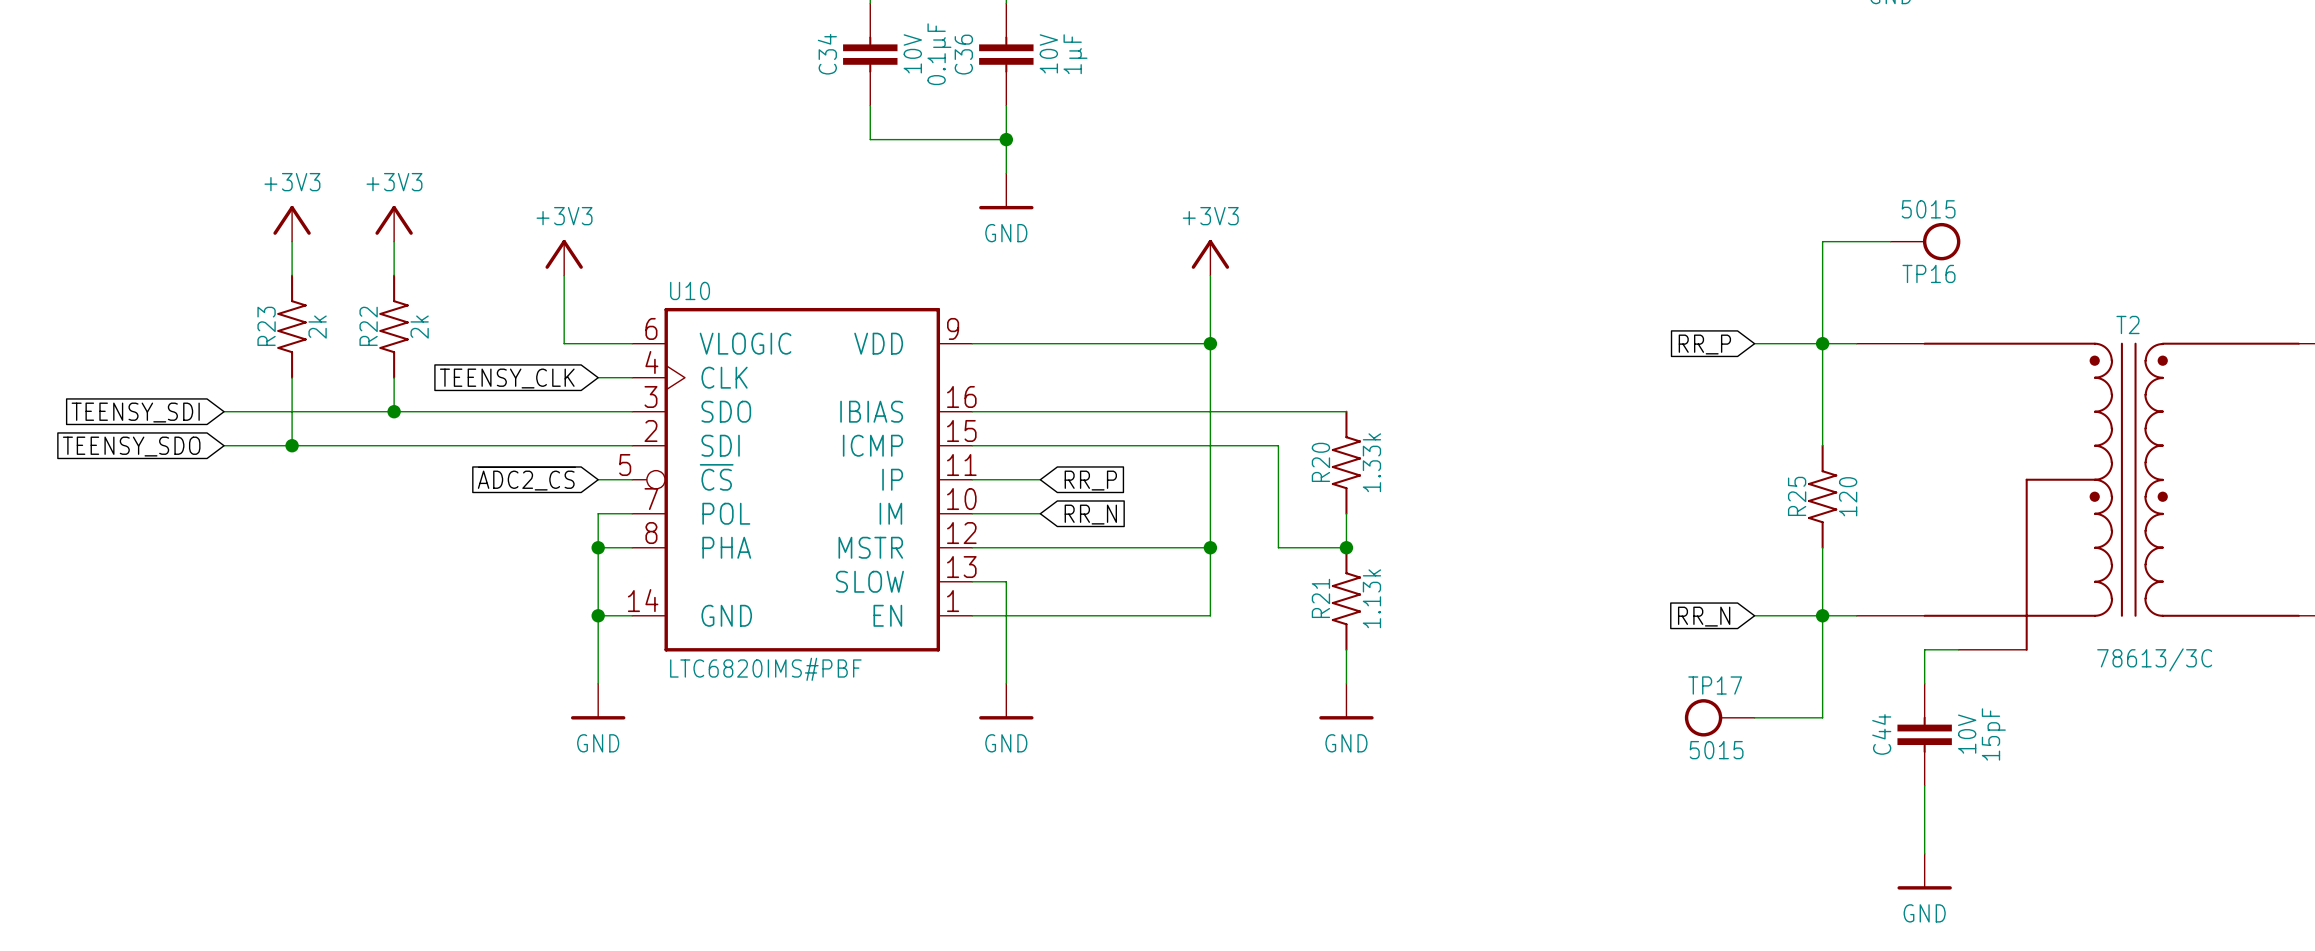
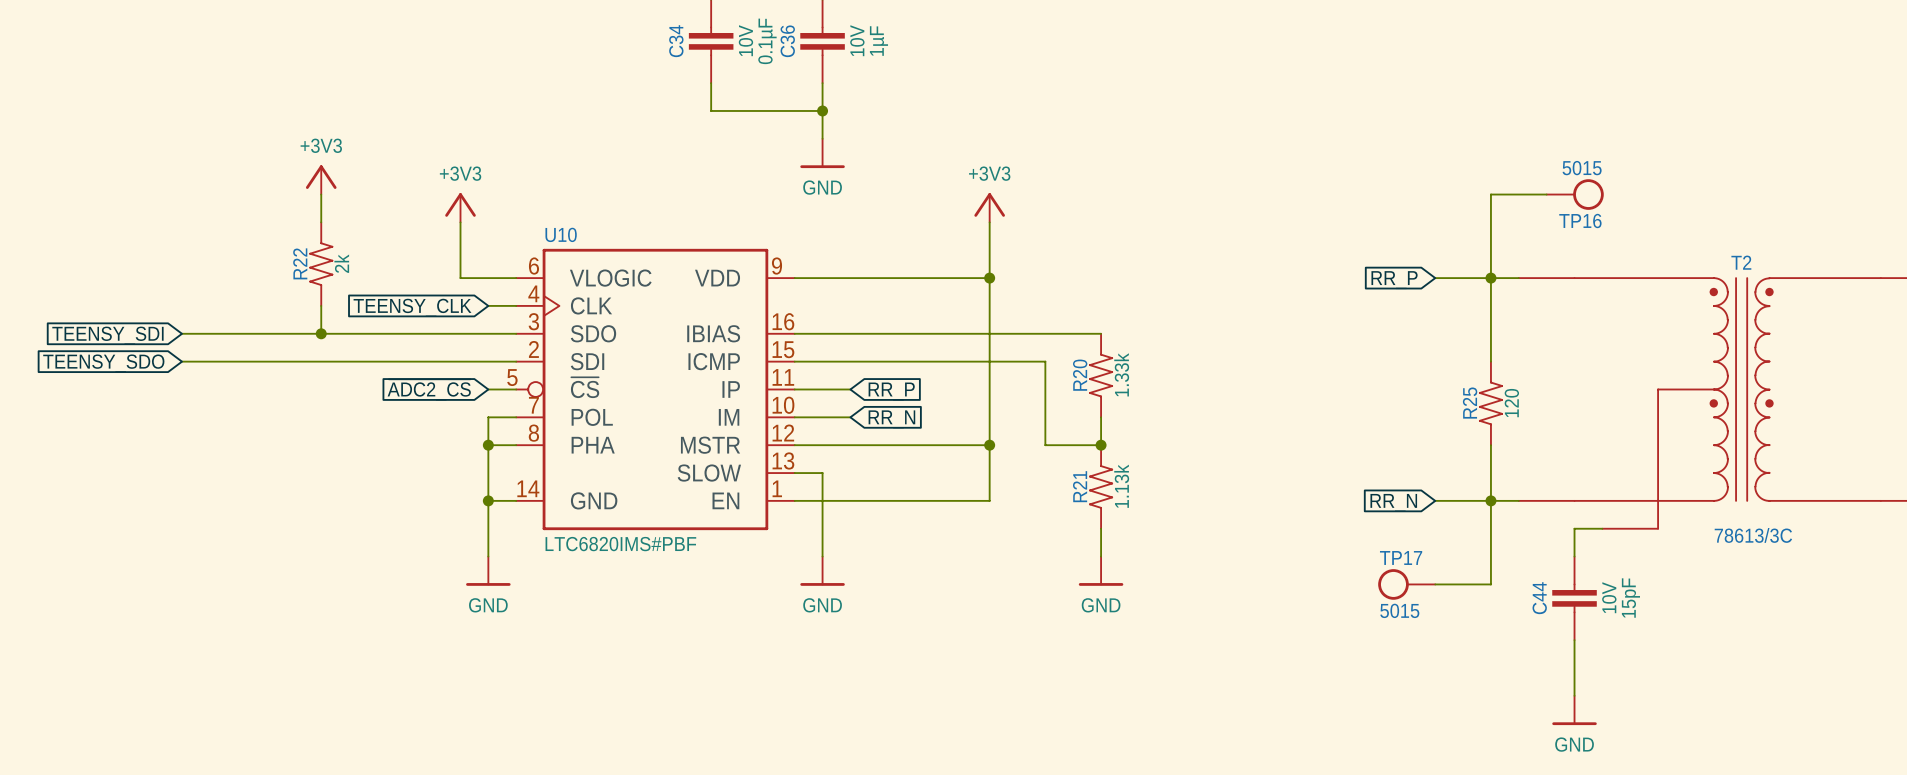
power symbol: +3V3 (292, 223) -> none
wire: (292, 241) (292, 275) -> none
R23: (292, 326) -> none
wire: (292, 377) (292, 445) -> none
junction: (292, 445) -> none

